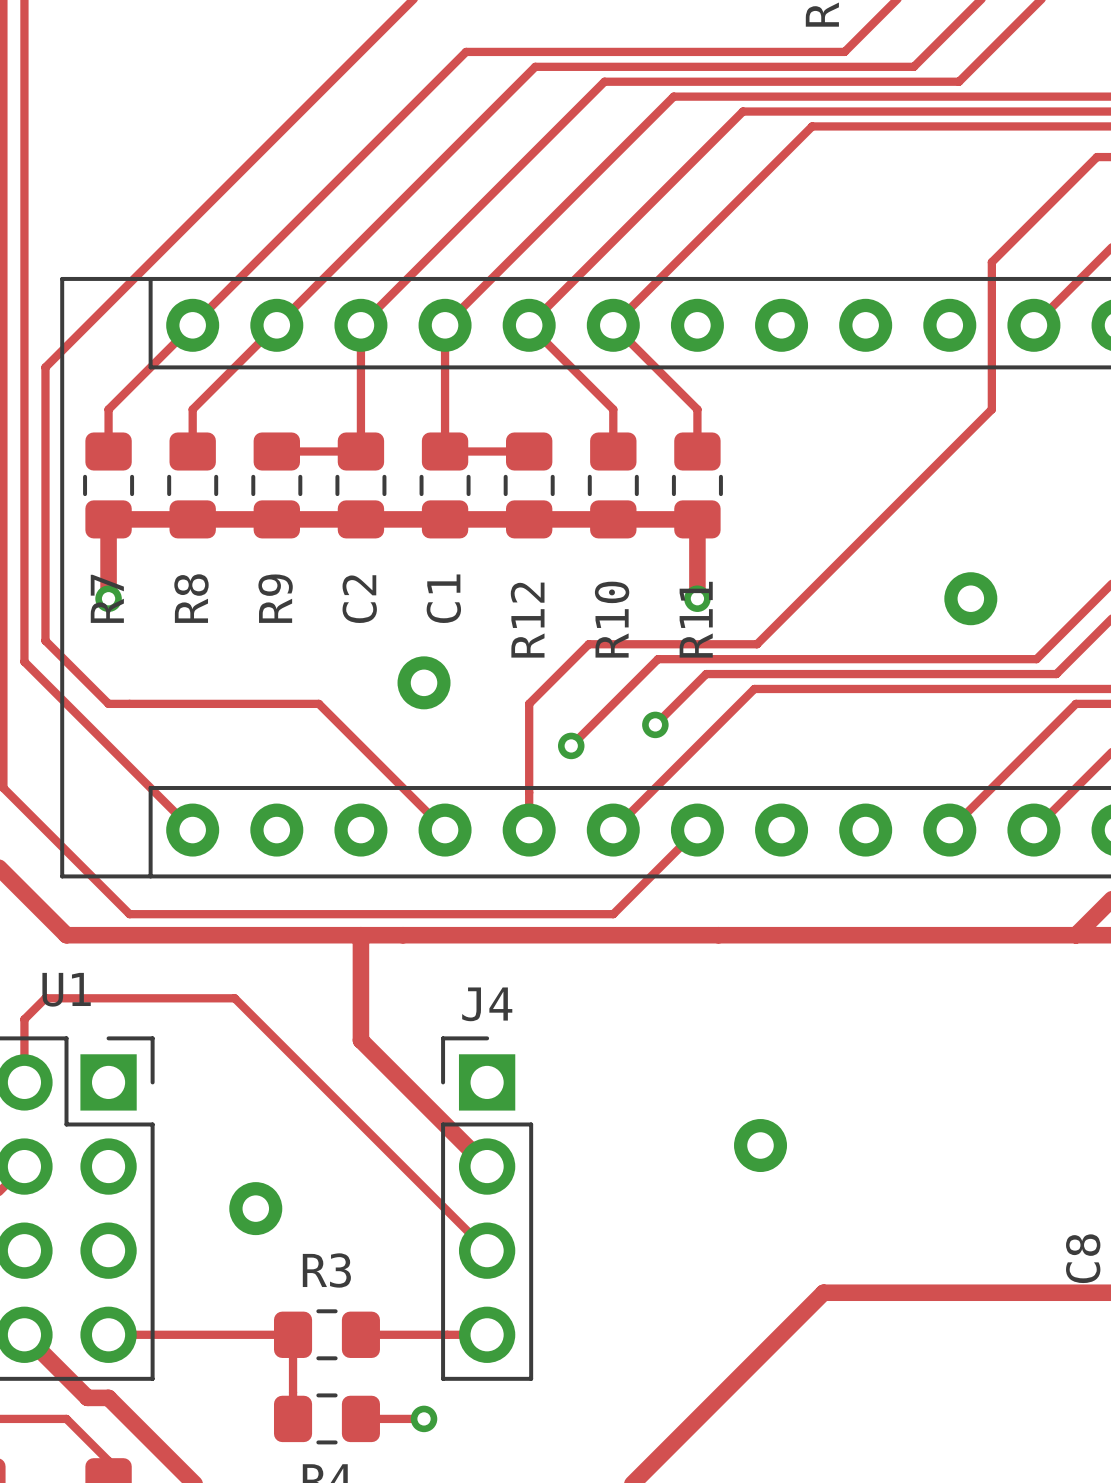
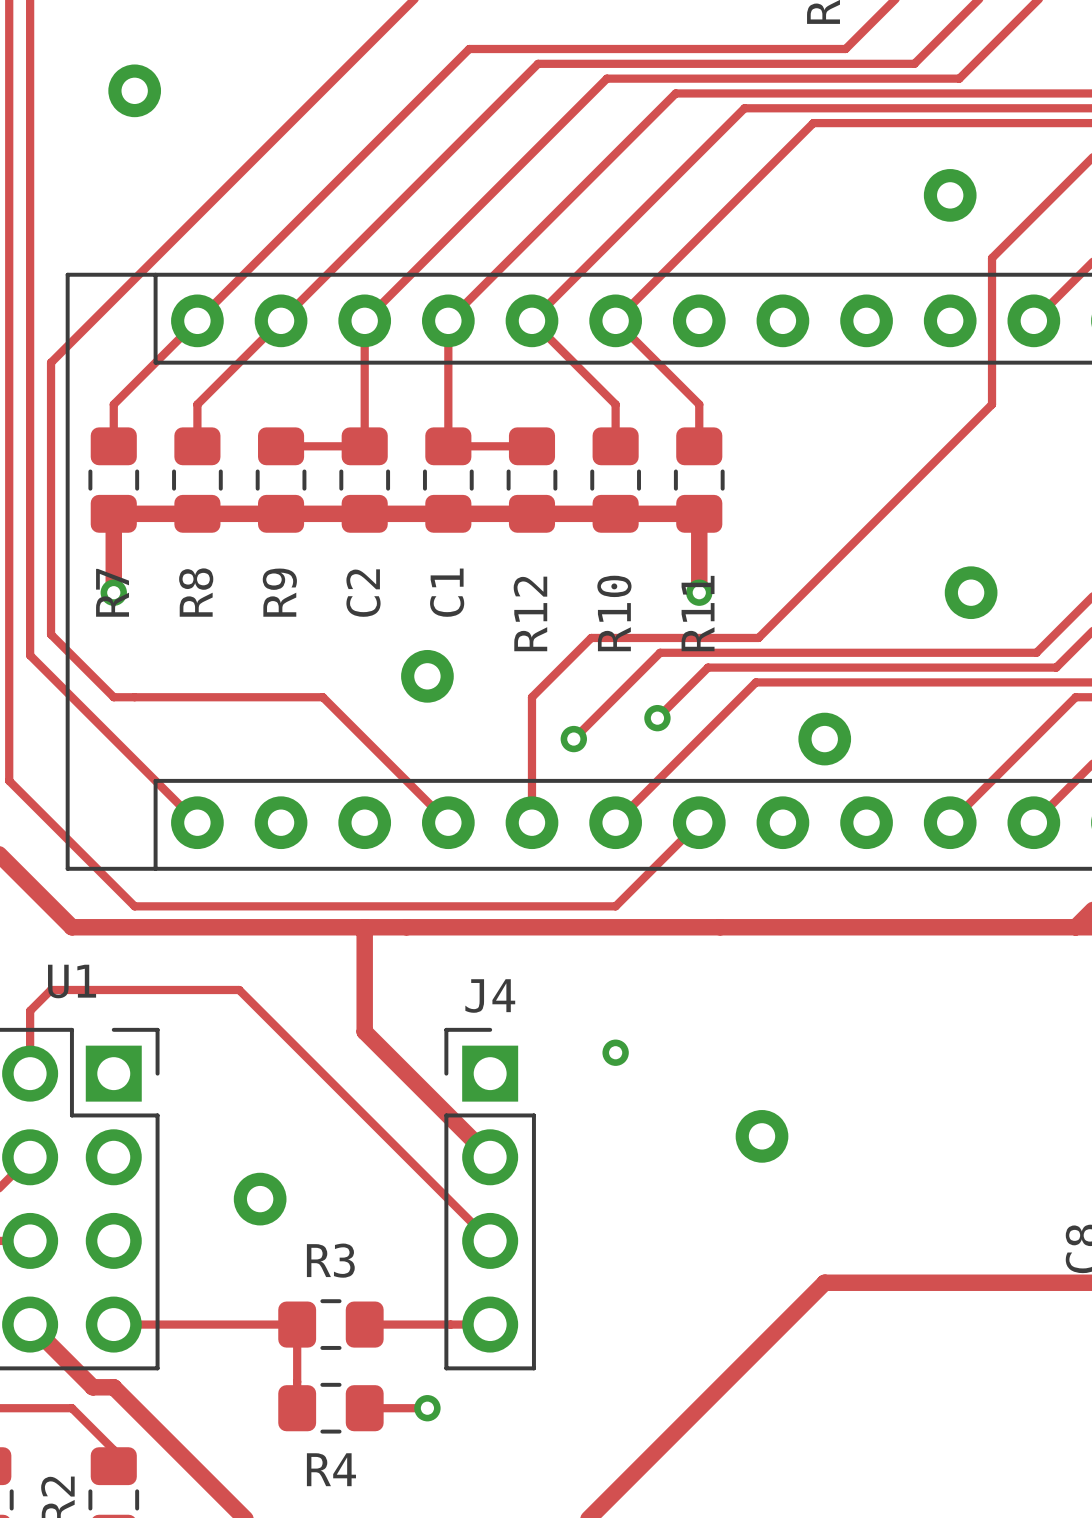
via: none -> (134, 90)
via: none -> (950, 195)
via: none -> (824, 739)
via: none -> (615, 1052)

